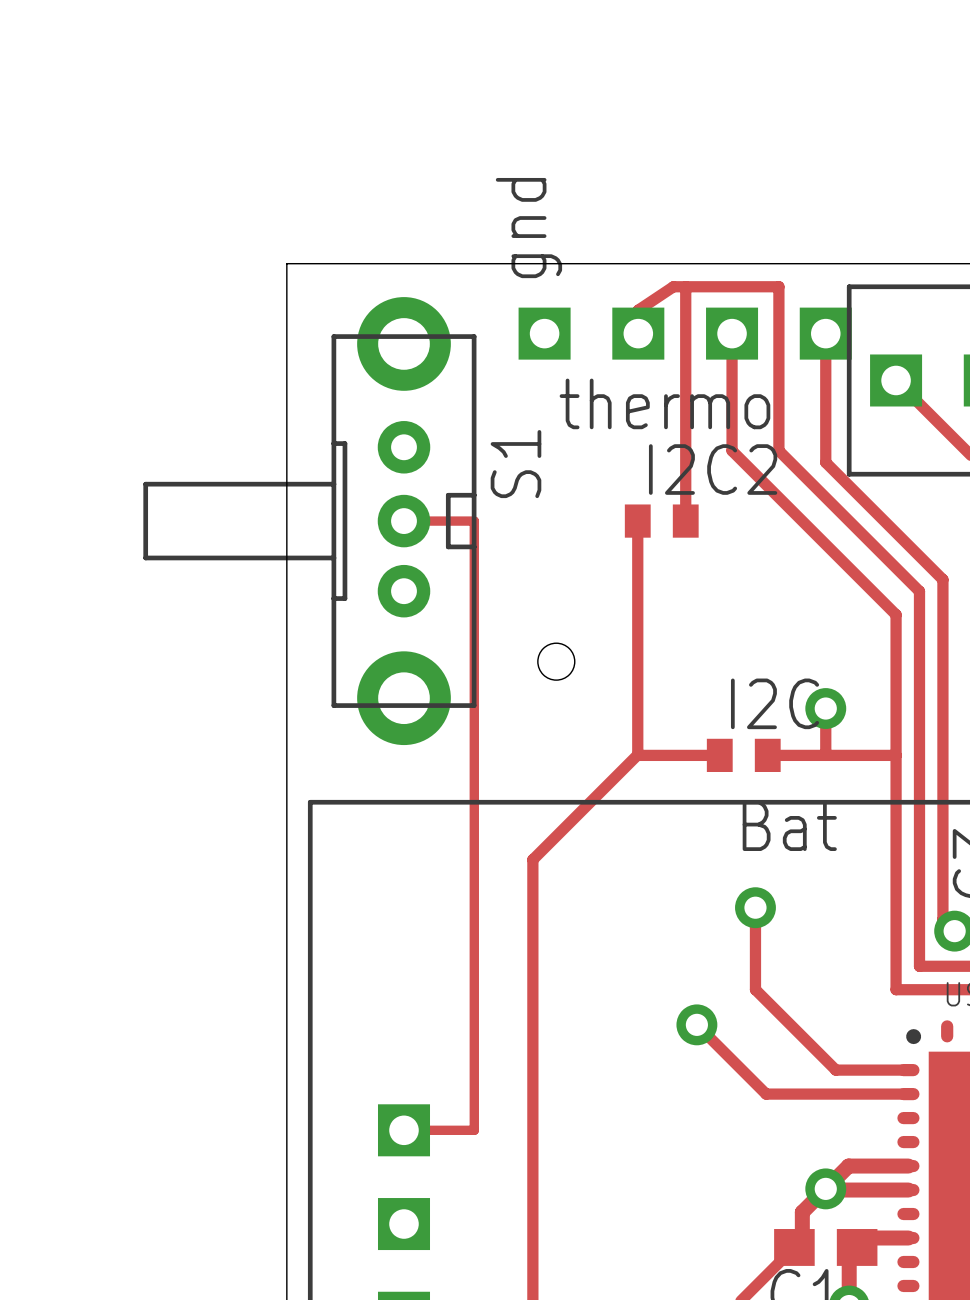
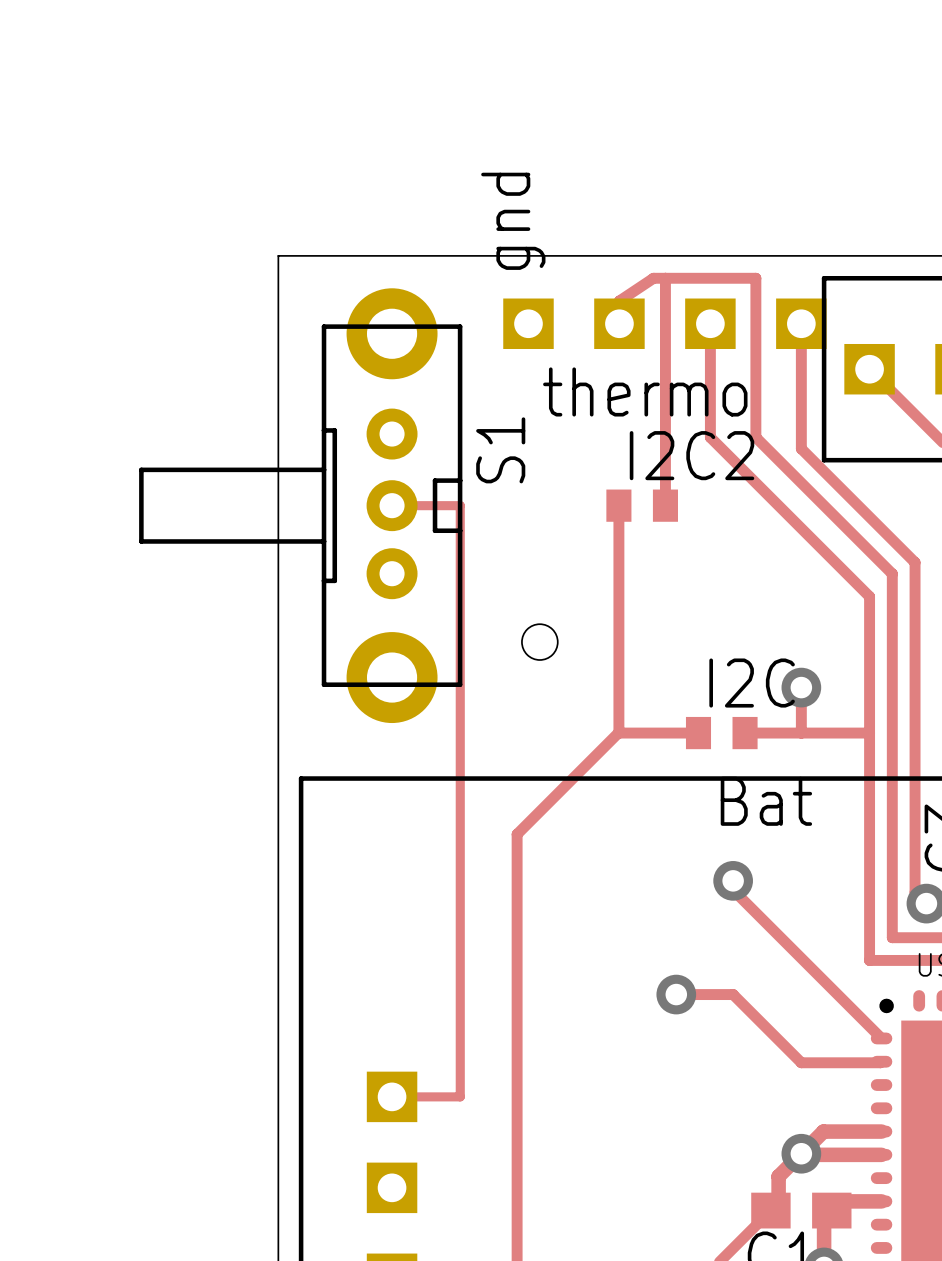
track: (755, 917) (755, 989) (835, 1070) (908, 1070) -> (733, 890) (881, 1038)
track: (696, 1024) (766, 1094) (908, 1094) -> (676, 994) (733, 994) (801, 1062) (881, 1061)

